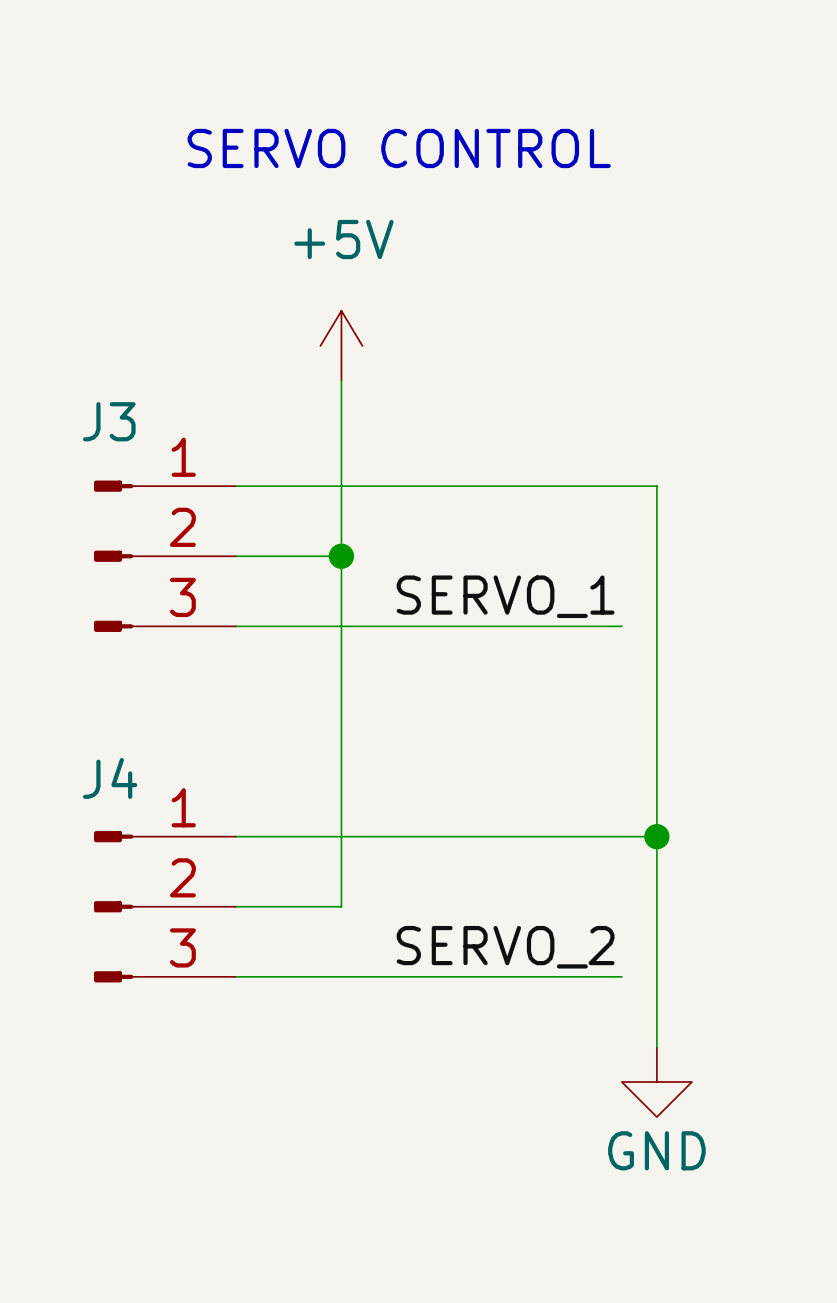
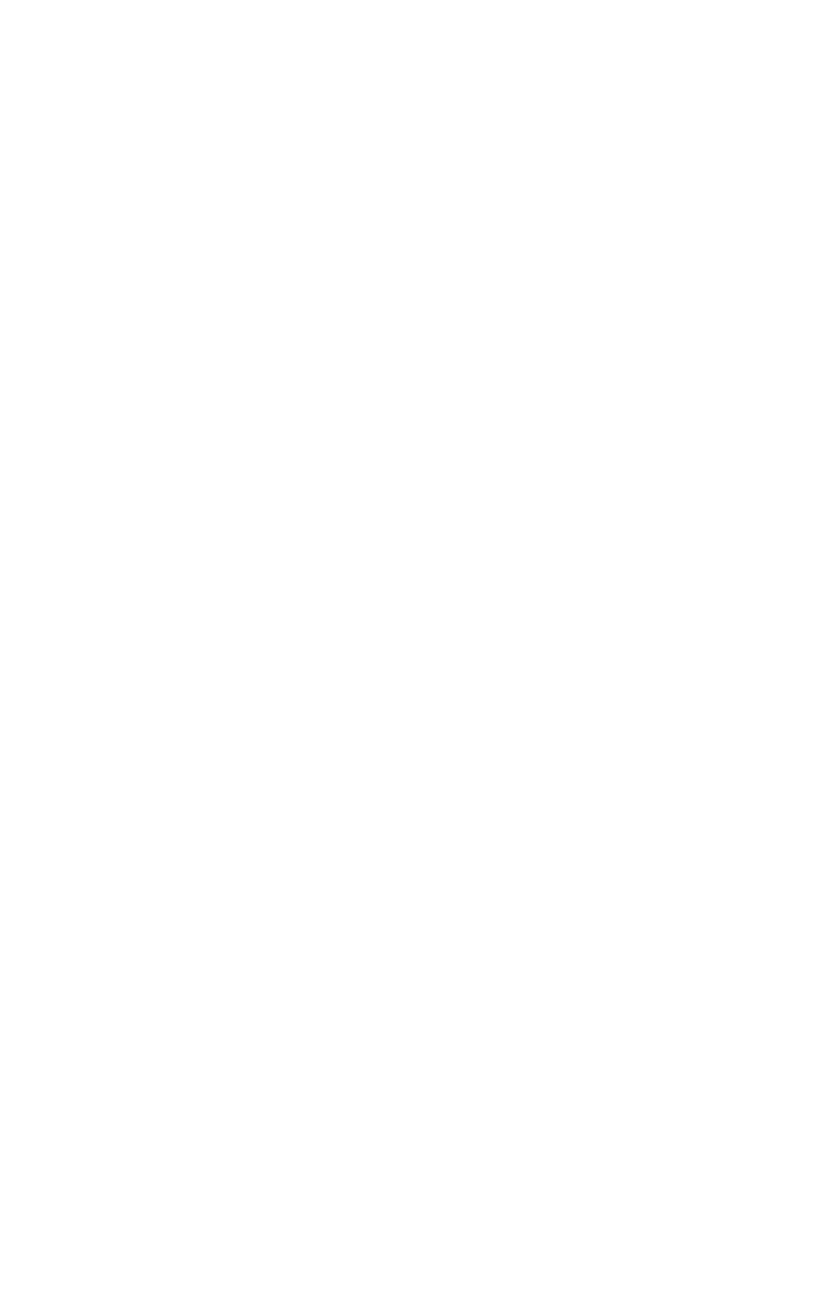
text: SERVO CONTROL (399, 148) -> none
power symbol: +5V (341, 345) -> none
wire: (341, 381) (341, 906) (236, 906) -> none
wire: (236, 486) (656, 486) (656, 1046) -> none
J3: (165, 556) -> none
wire: (236, 556) (341, 556) -> none
junction: (341, 556) -> none
label: SERVO_1 (505, 596) -> none
wire: (236, 626) (621, 626) -> none
wire: (236, 836) (656, 836) -> none
junction: (656, 836) -> none
J4: (165, 906) -> none
label: SERVO_2 (505, 947) -> none
wire: (236, 976) (621, 976) -> none
power symbol: GND (656, 1082) -> none

